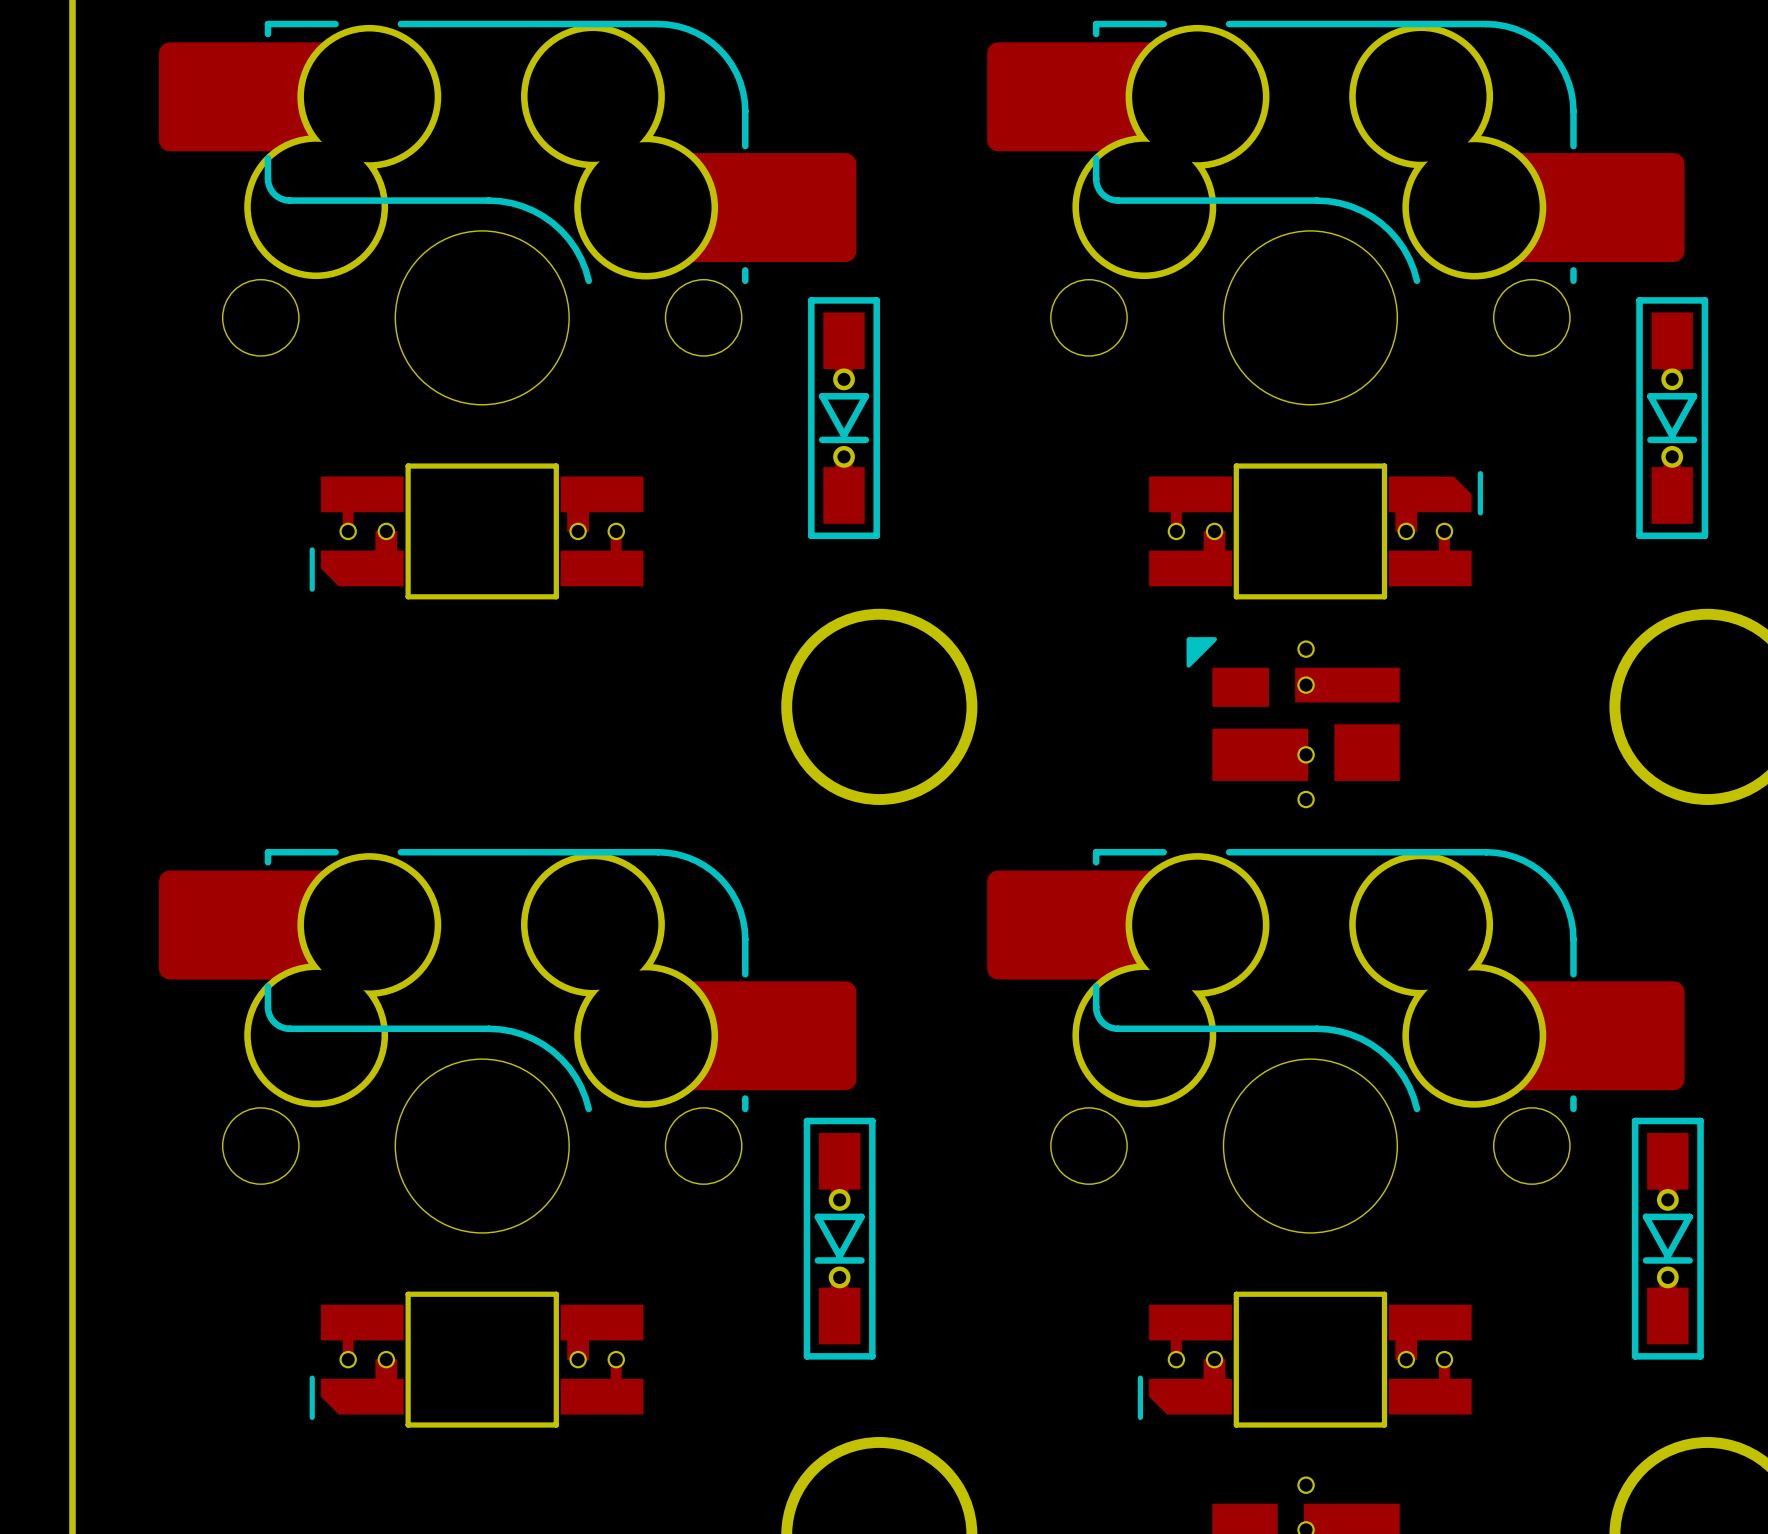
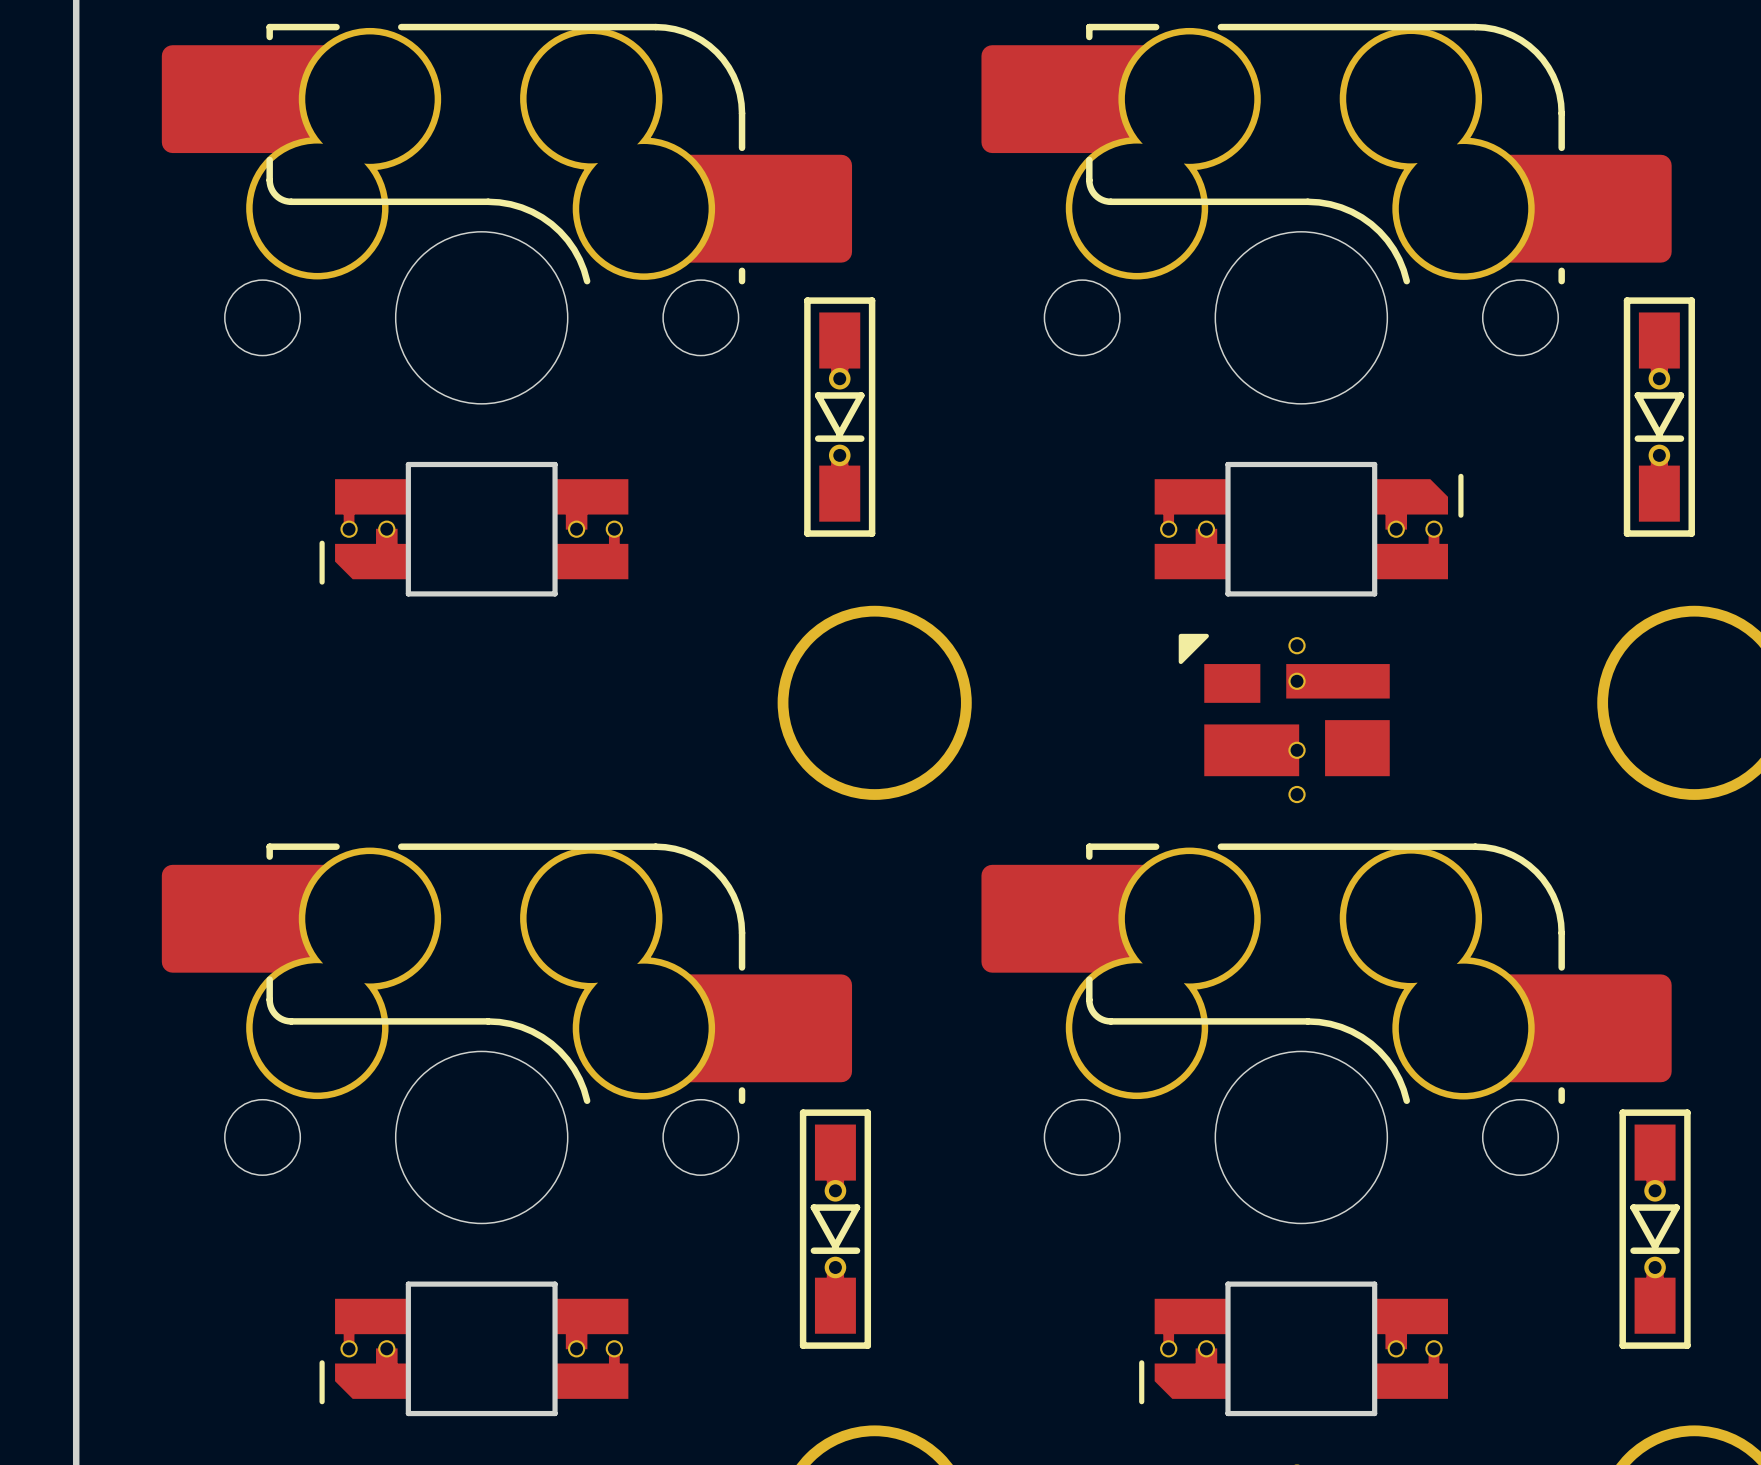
part footprint: [309, 463, 644, 600] -> [319, 461, 629, 597]
part footprint: [1149, 463, 1484, 600] -> [1154, 461, 1464, 597]
part footprint: [309, 1291, 644, 1428] -> [319, 1281, 629, 1417]
part footprint: [1137, 1291, 1472, 1428] -> [1139, 1281, 1449, 1417]

